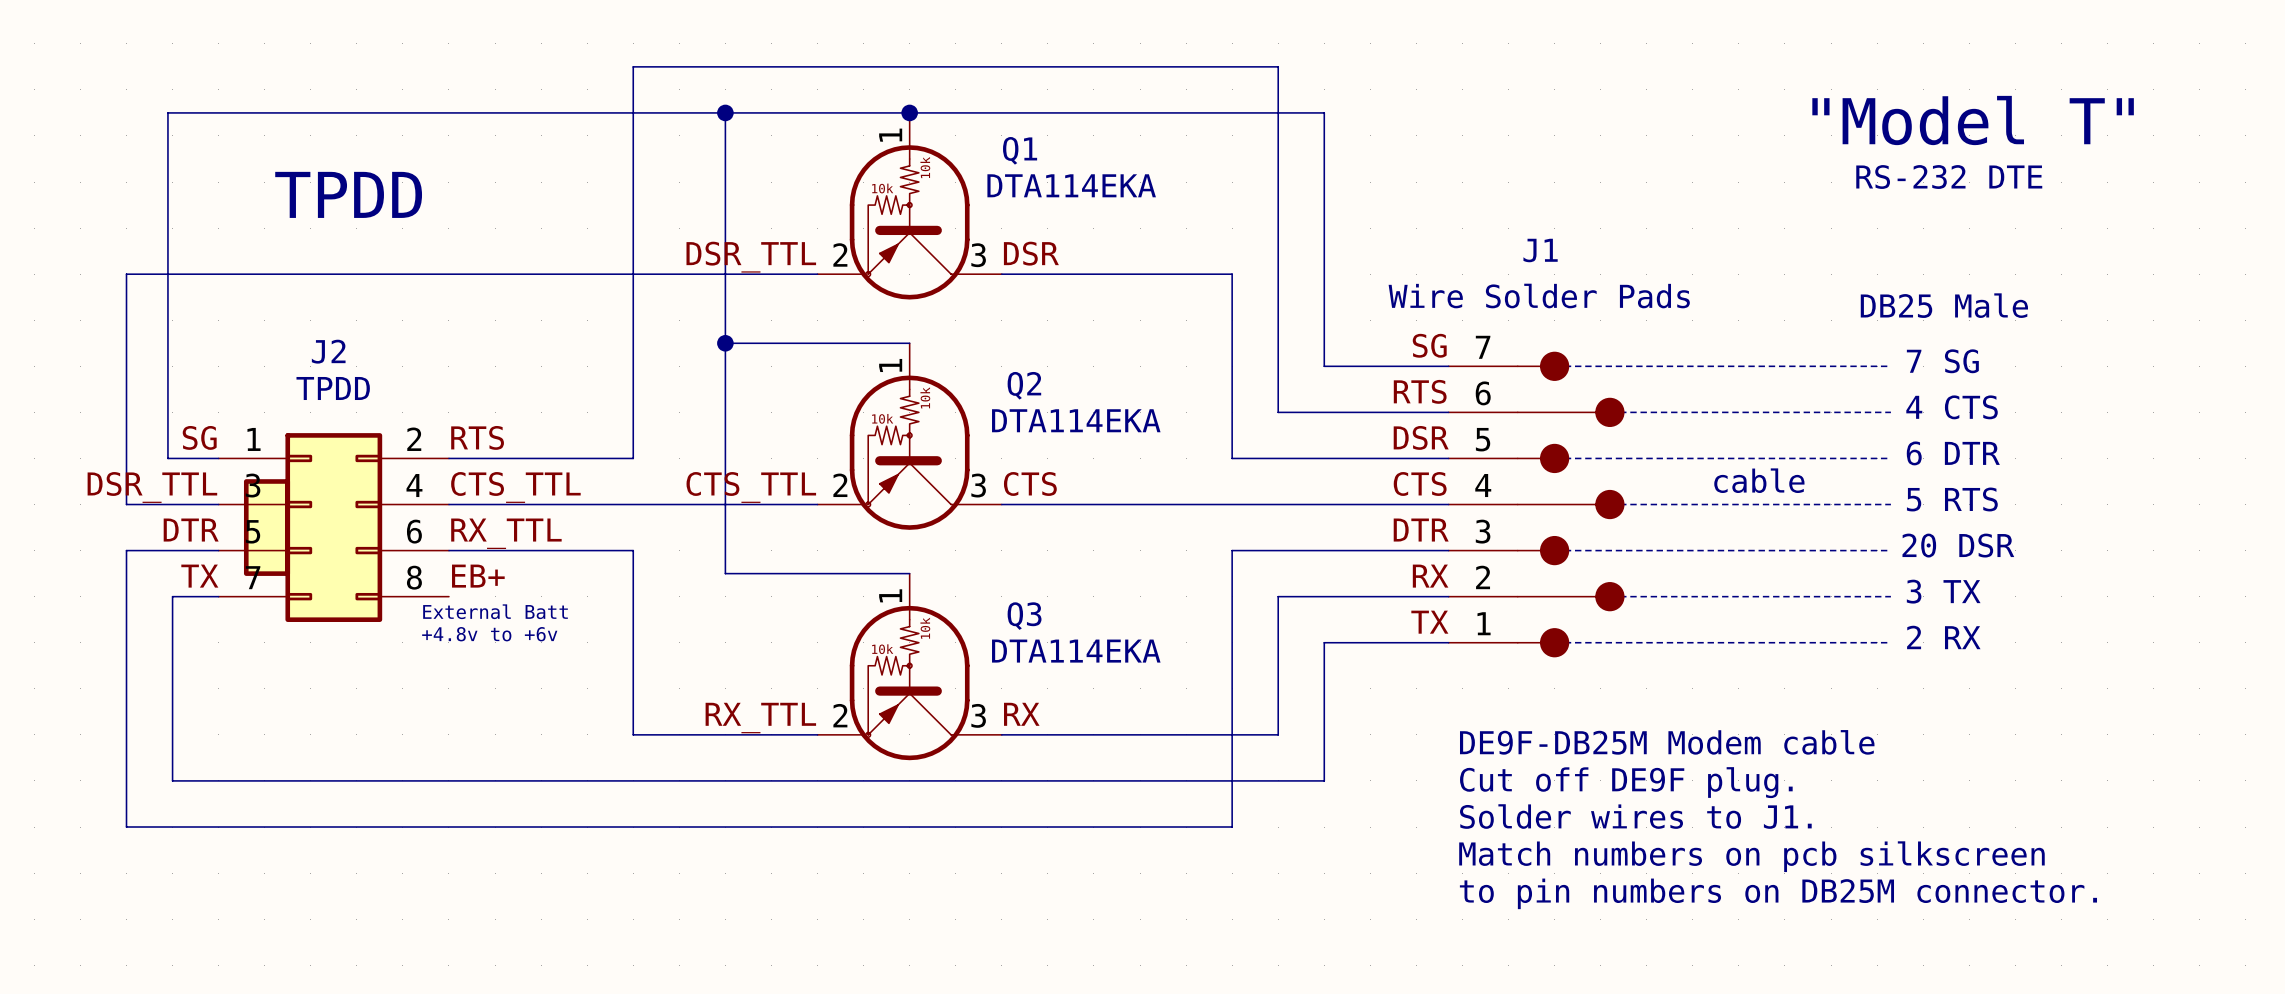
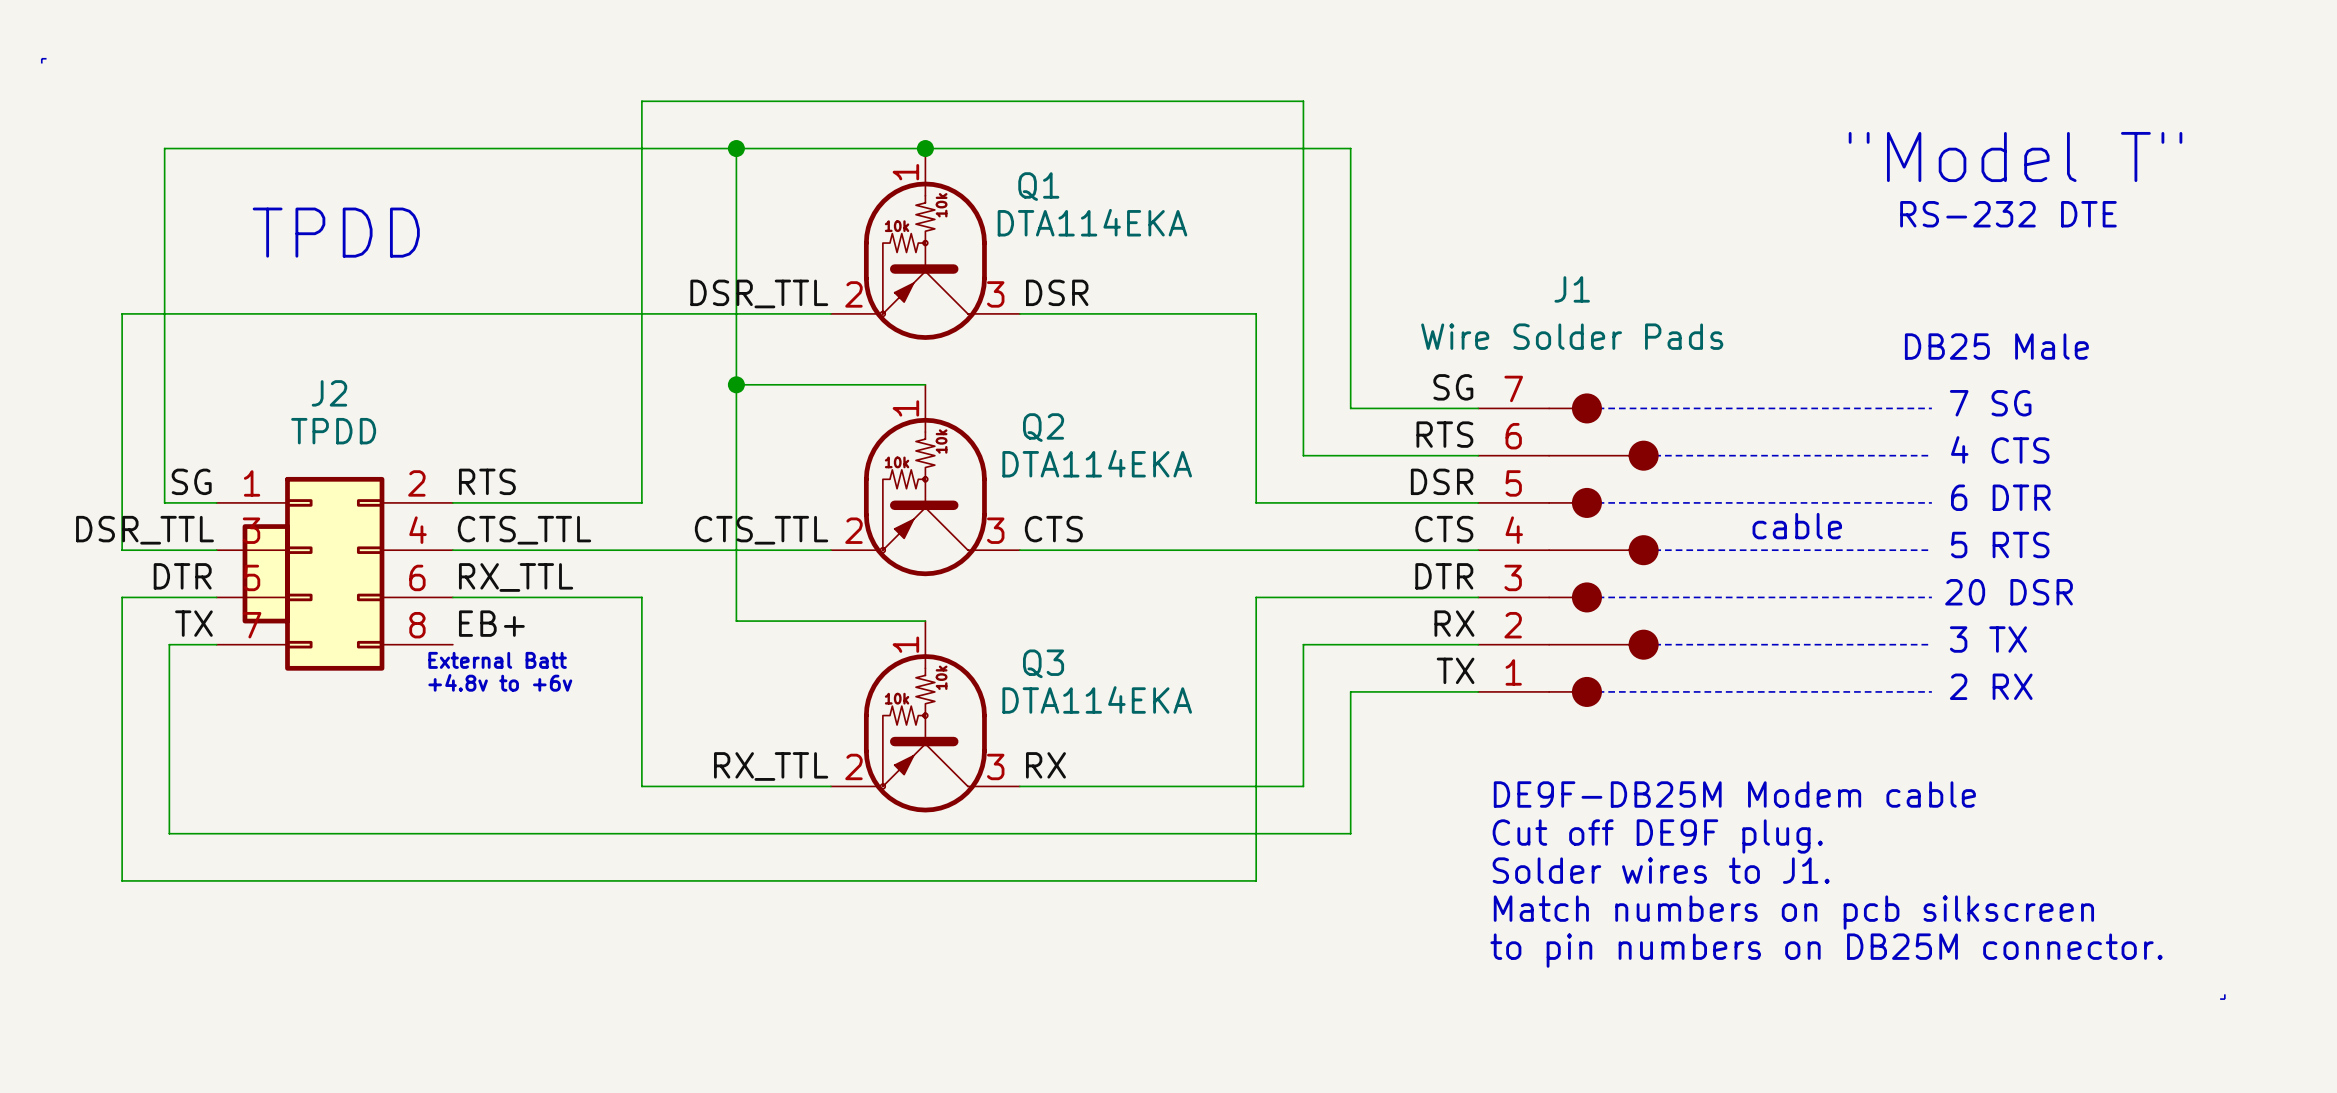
line: none -> (46, 58) (41, 58) (41, 63)
line: none -> (2224, 994) (2224, 999) (2220, 999)

